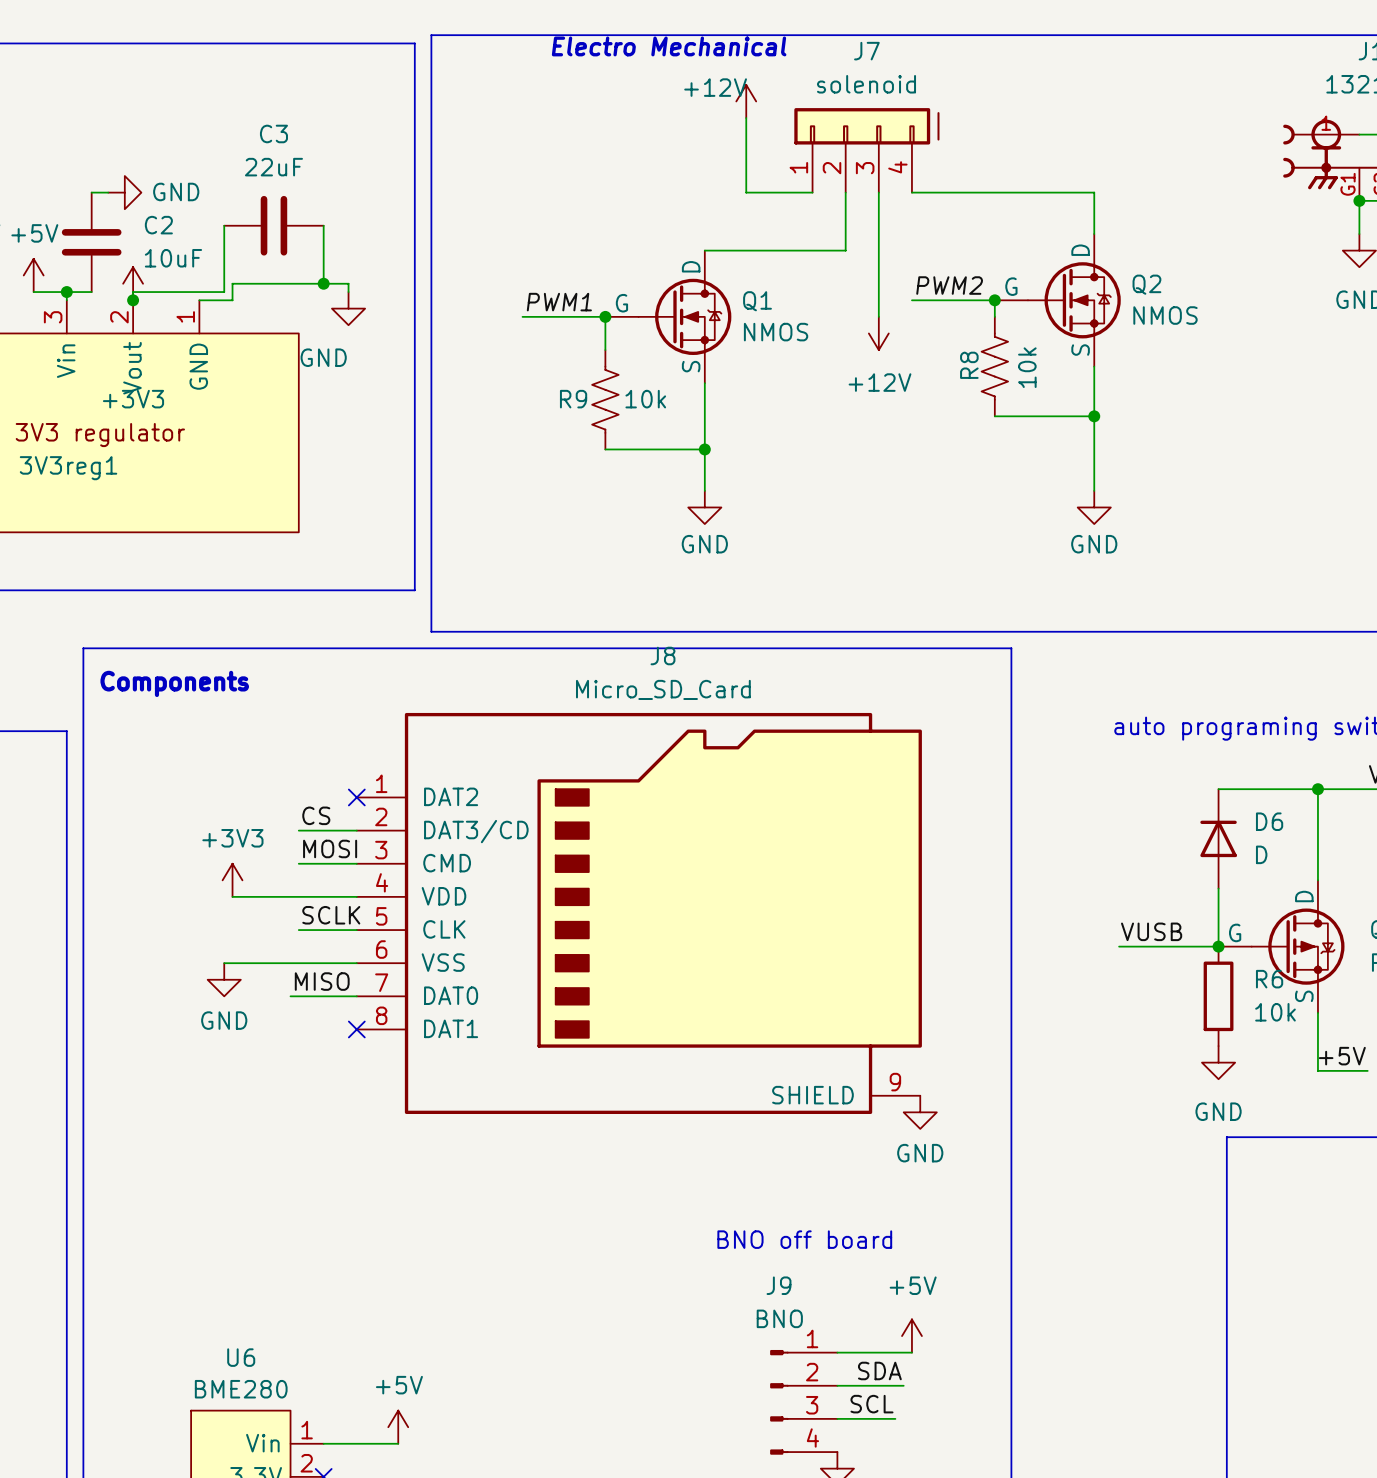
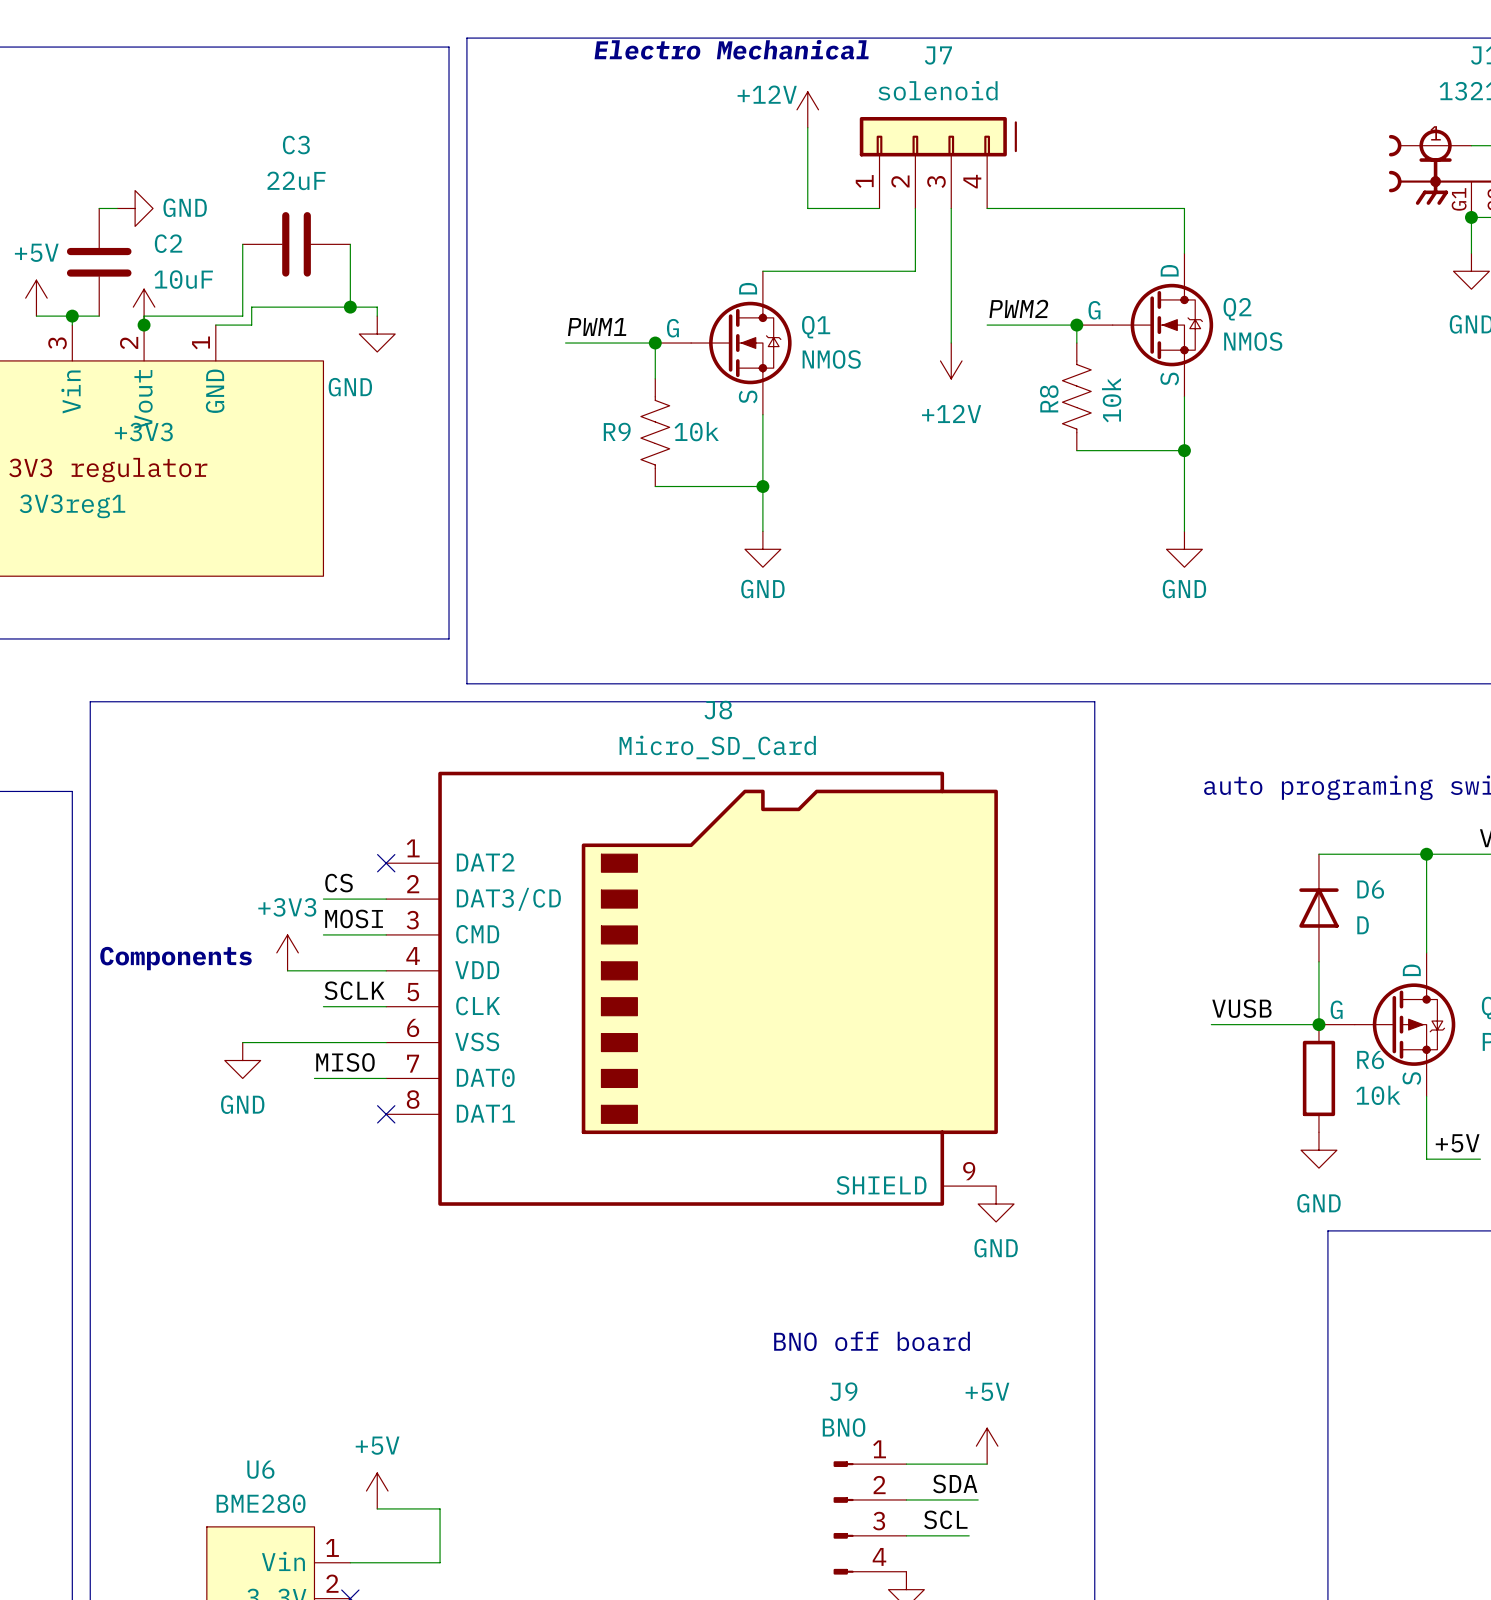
text position: Components (174, 683) -> Components (176, 958)
power symbol position: +3V3 (232, 880) -> +3V3 (287, 952)
wire: (232, 896) (265, 896) -> none
wire: none -> (377, 1508) (440, 1508) (440, 1562) (431, 1562)
power symbol position: +5V (398, 1427) -> +5V (377, 1491)

